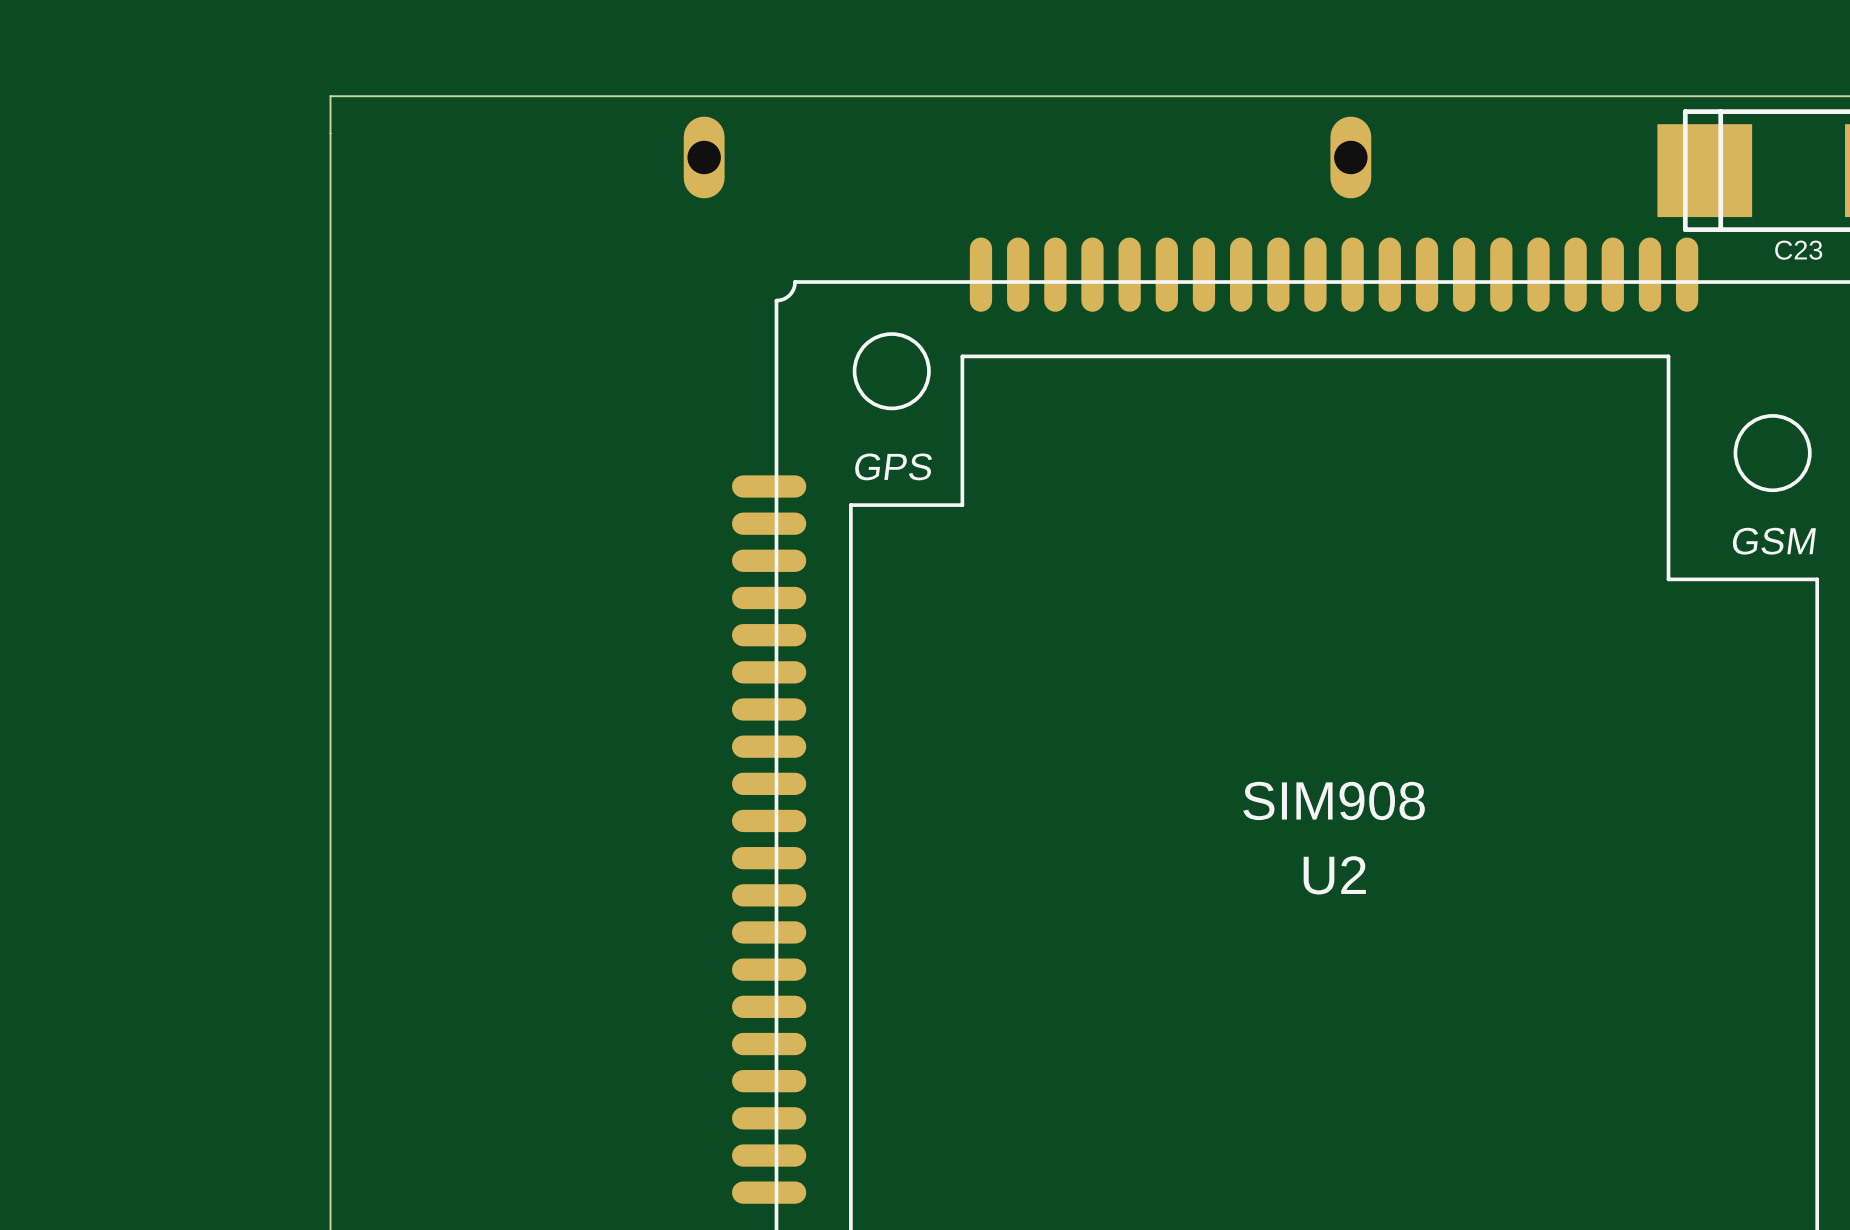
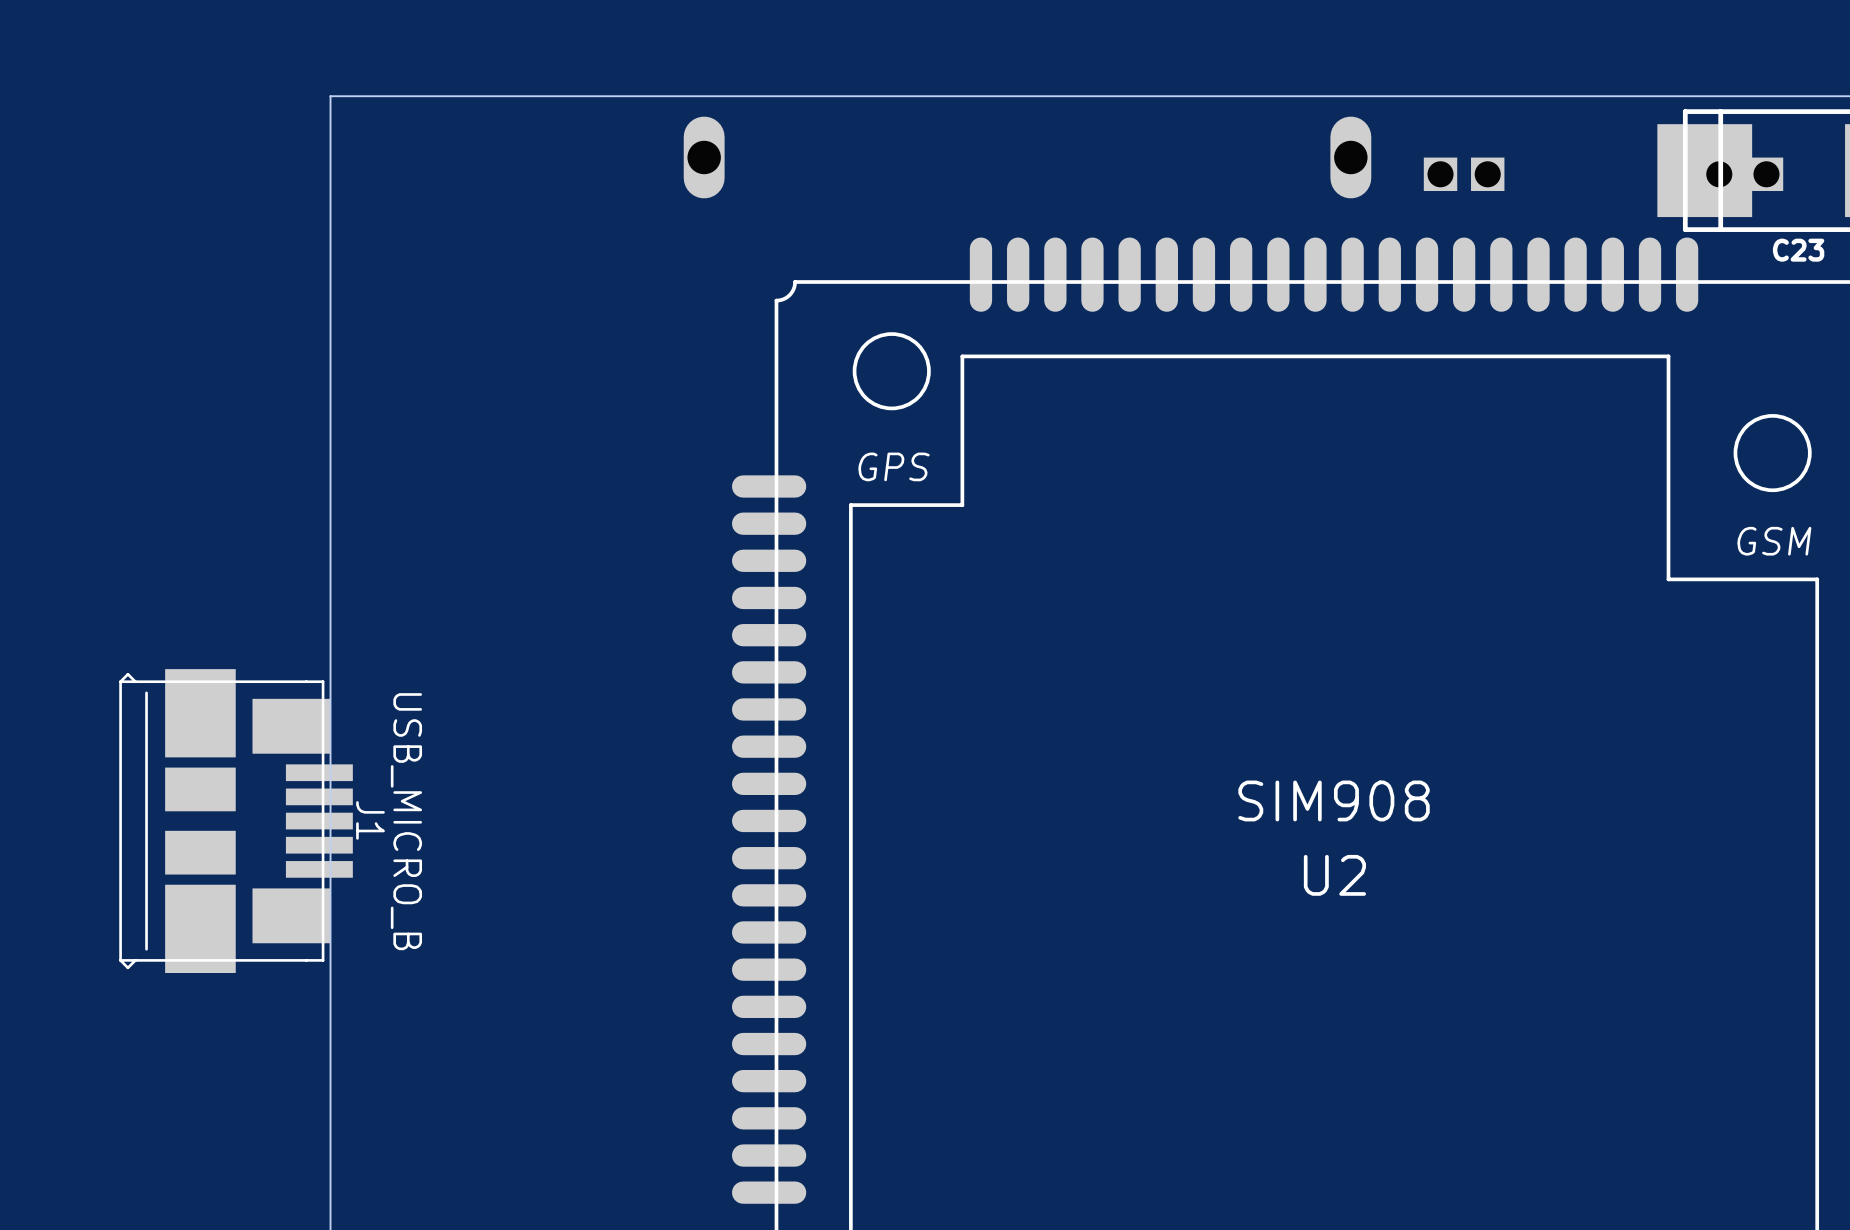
part: none -> (1464, 174)
part: none -> (1742, 174)
J1: none -> USB_MICRO_B (236, 821)

